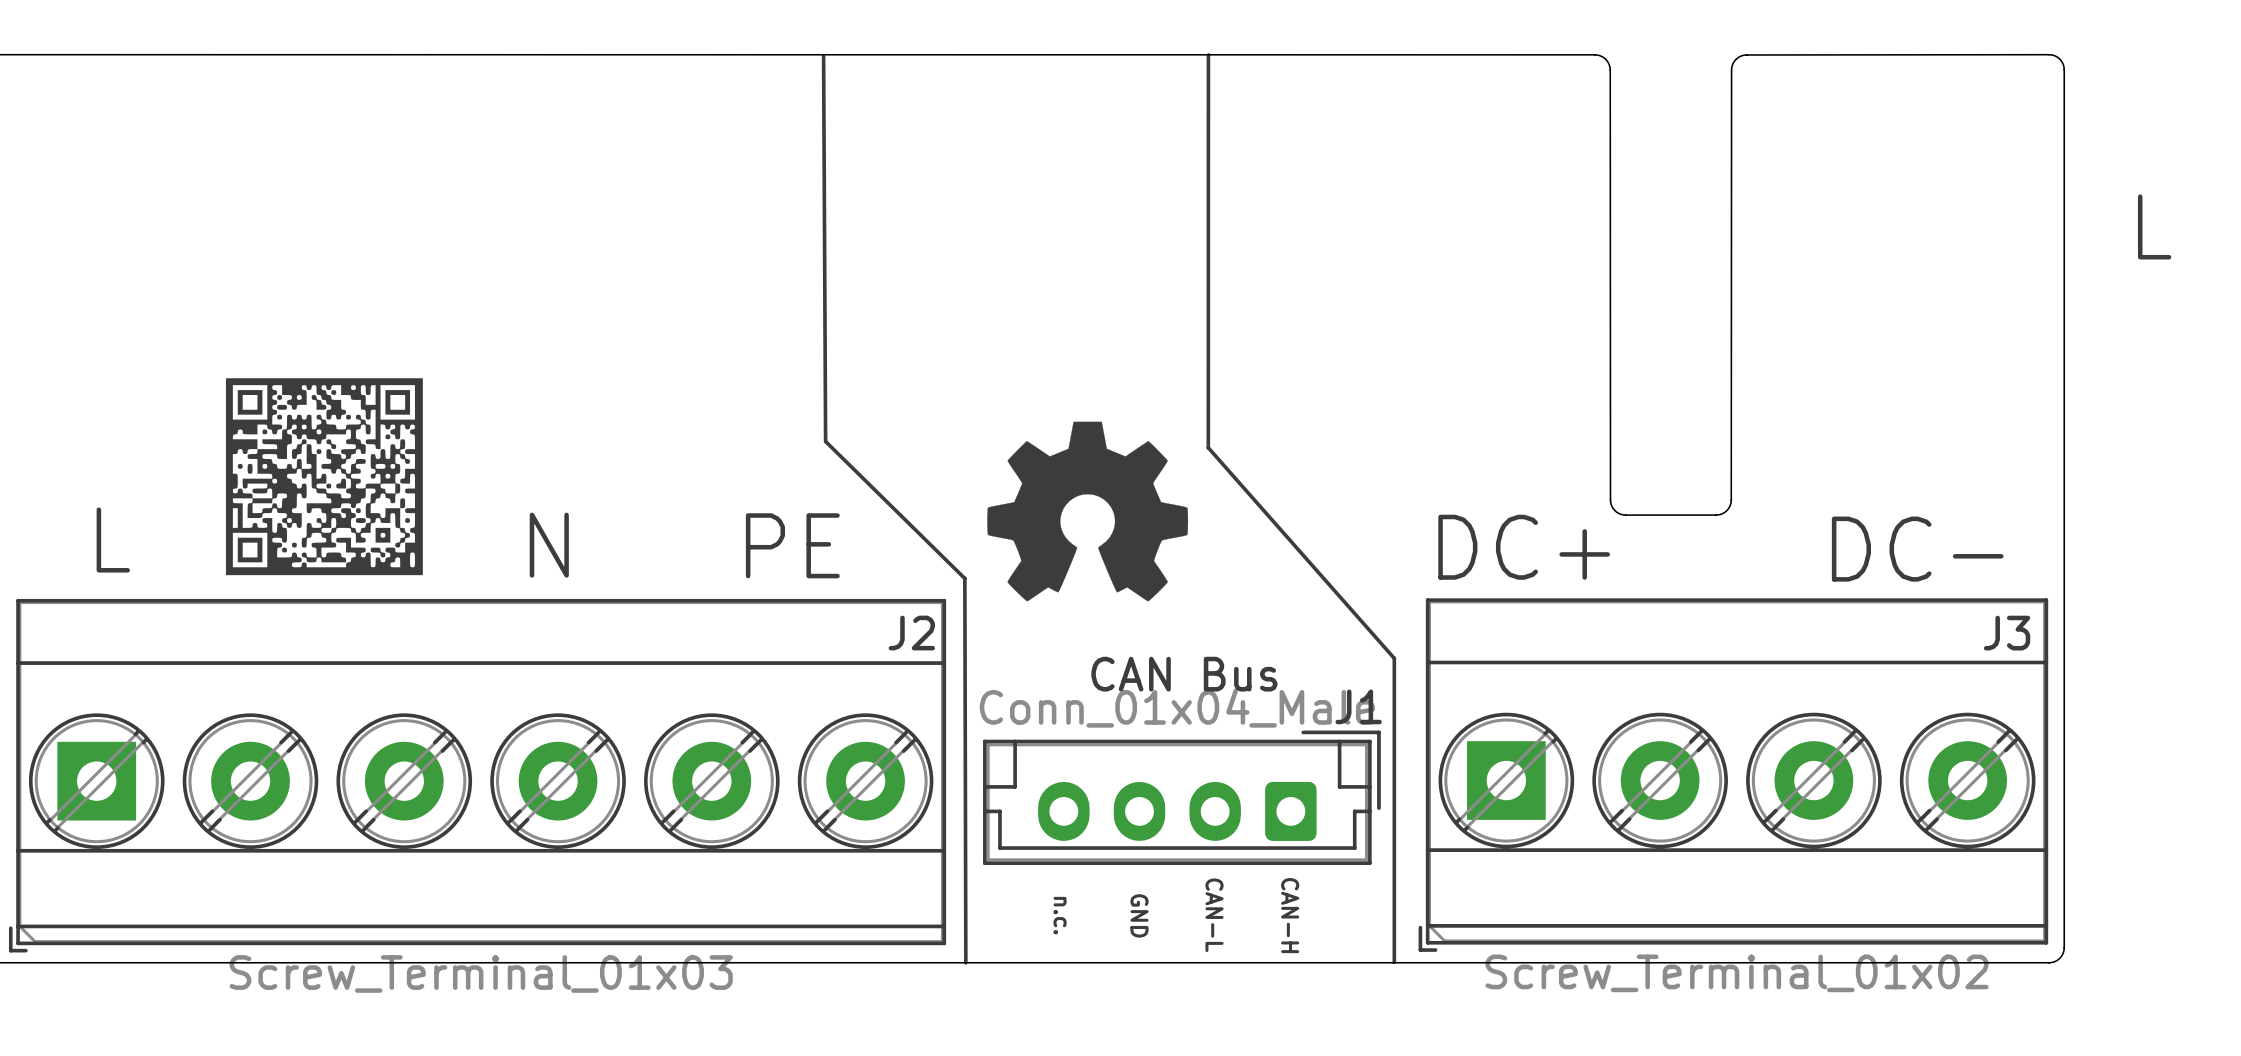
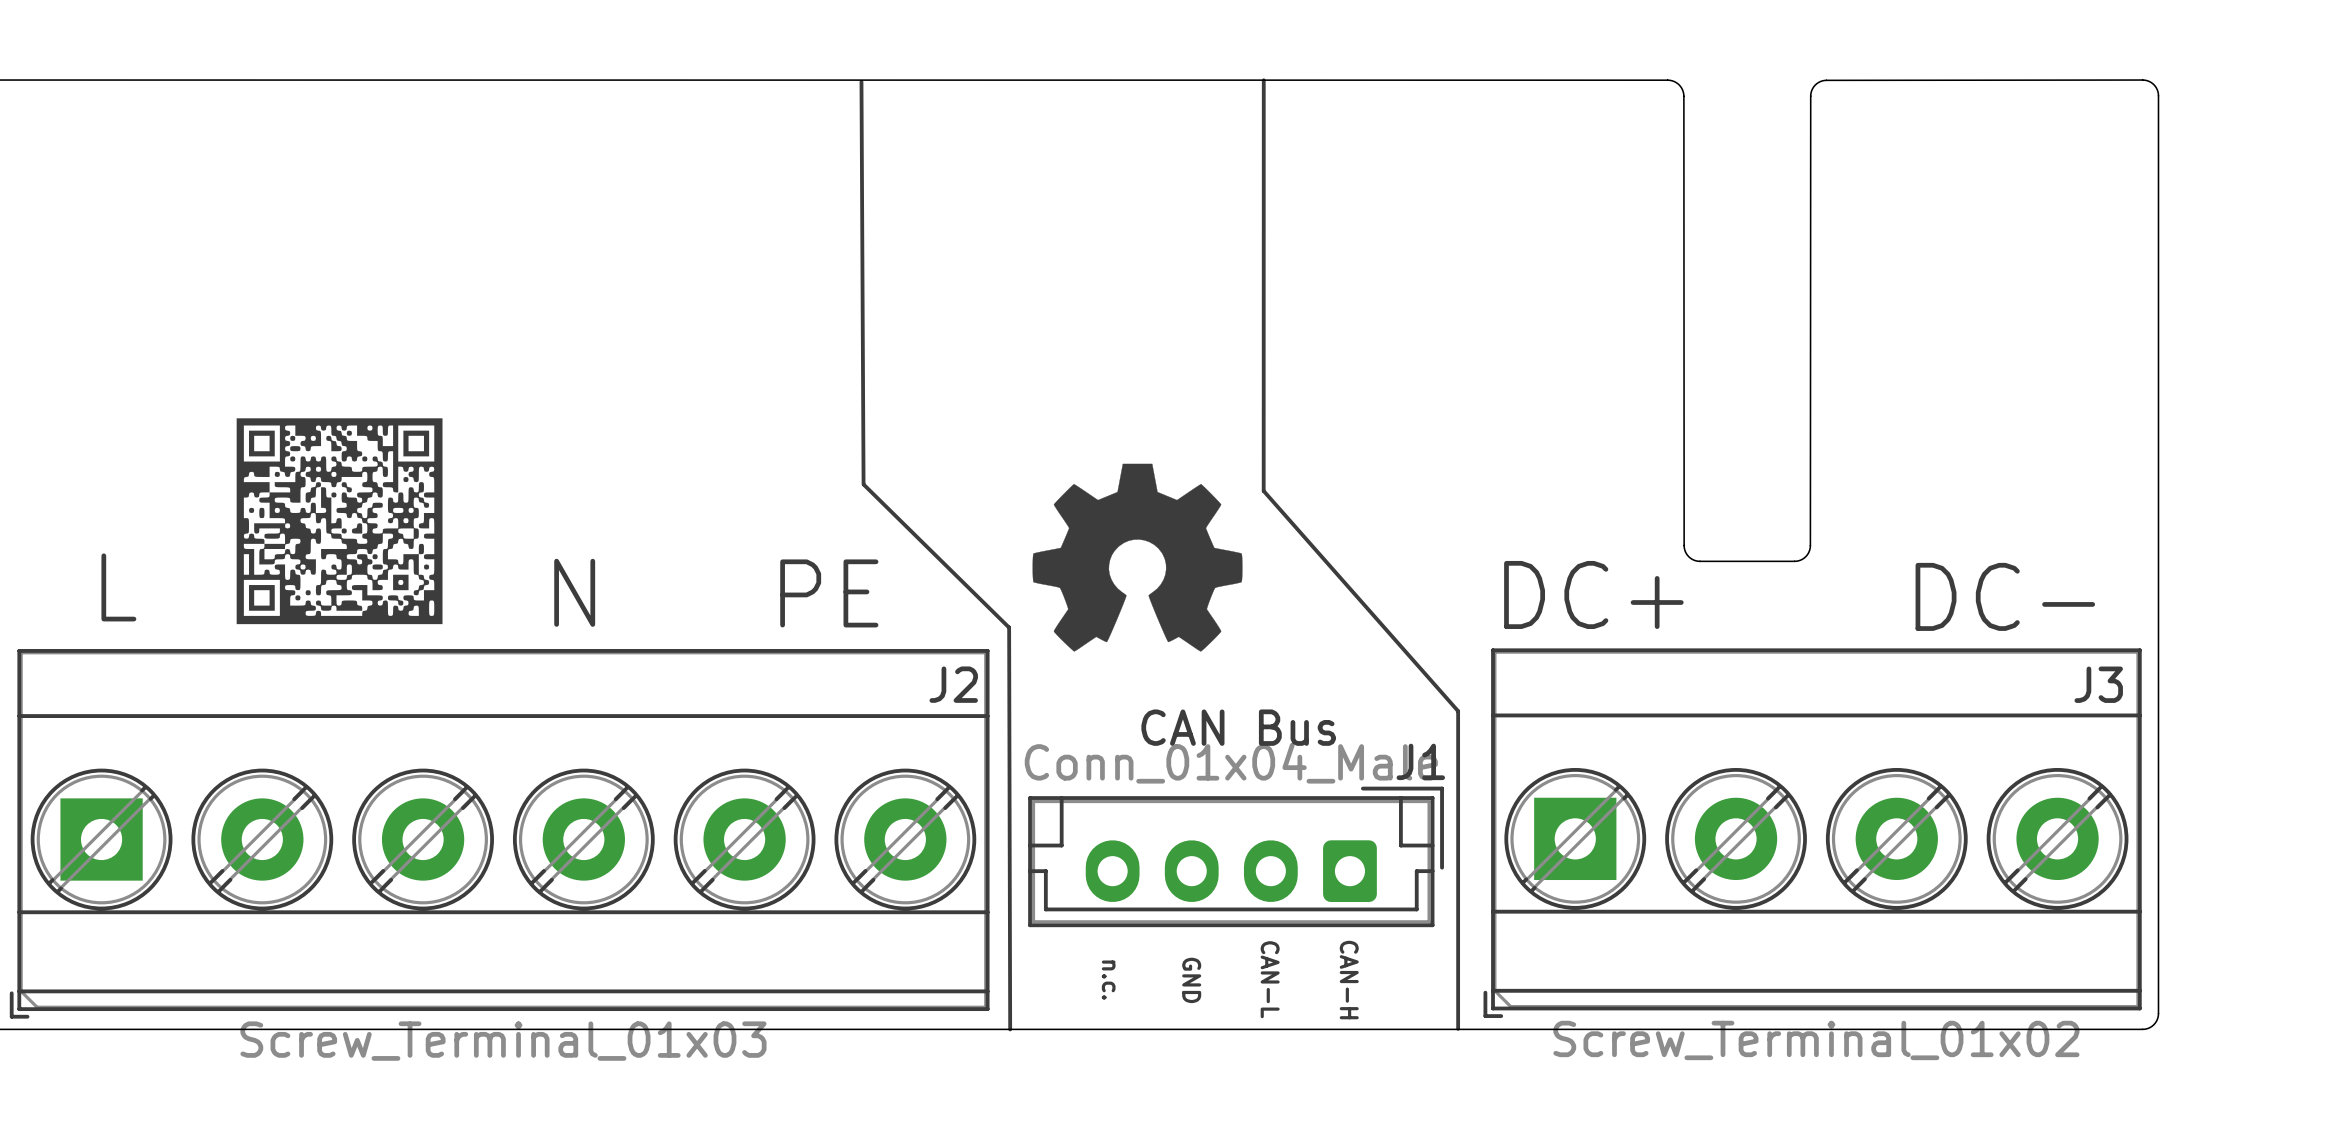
text: L (2154, 226) -> none

